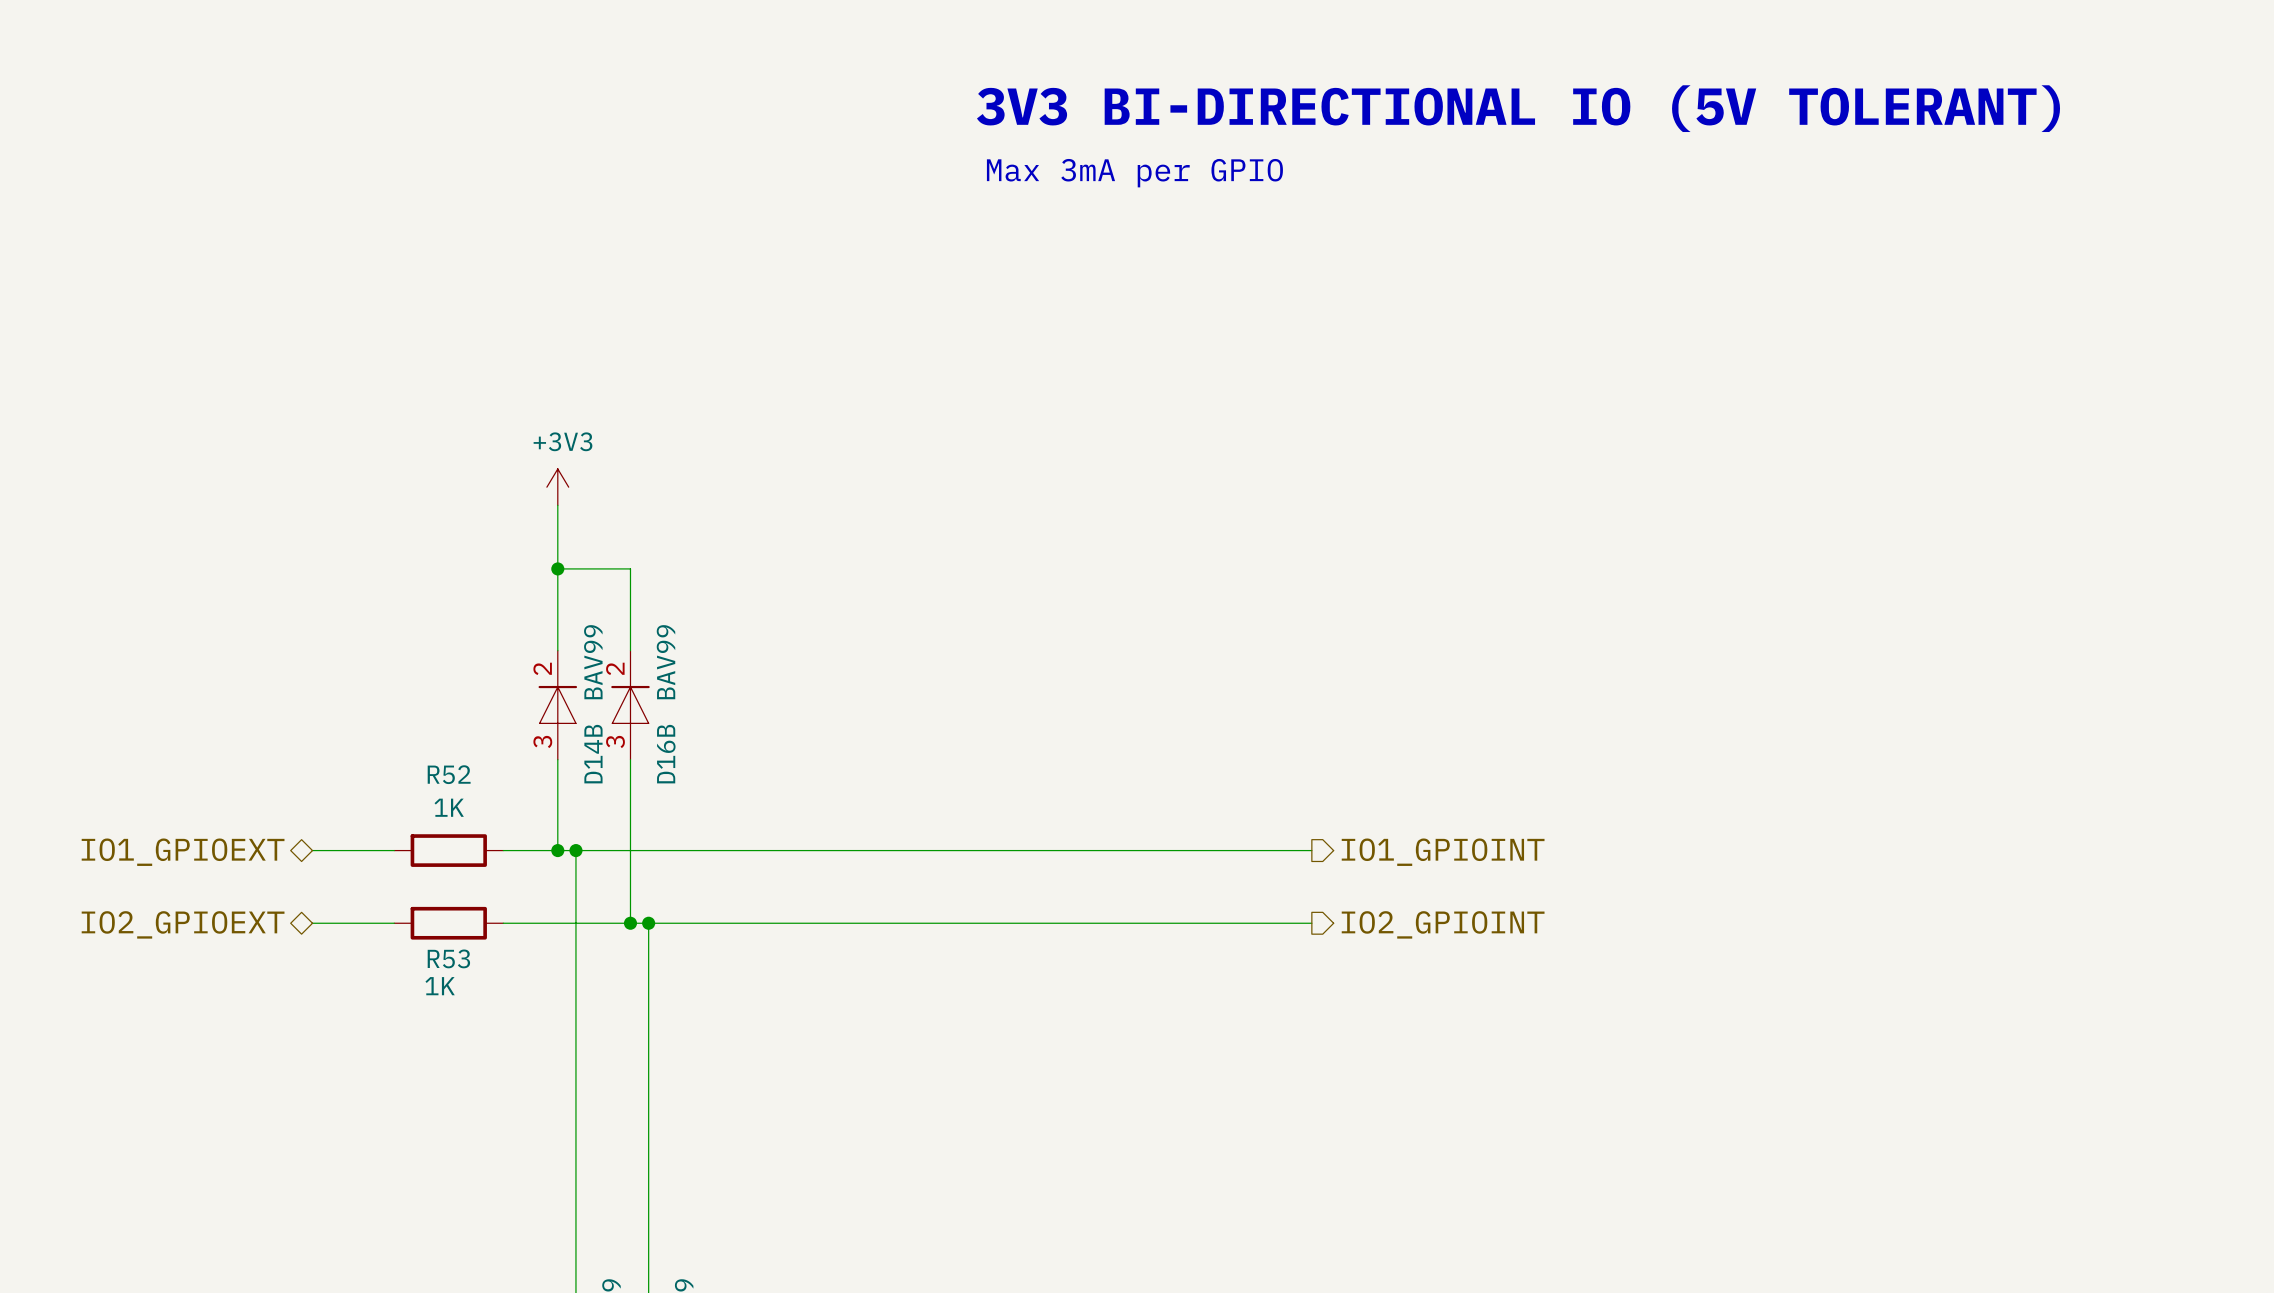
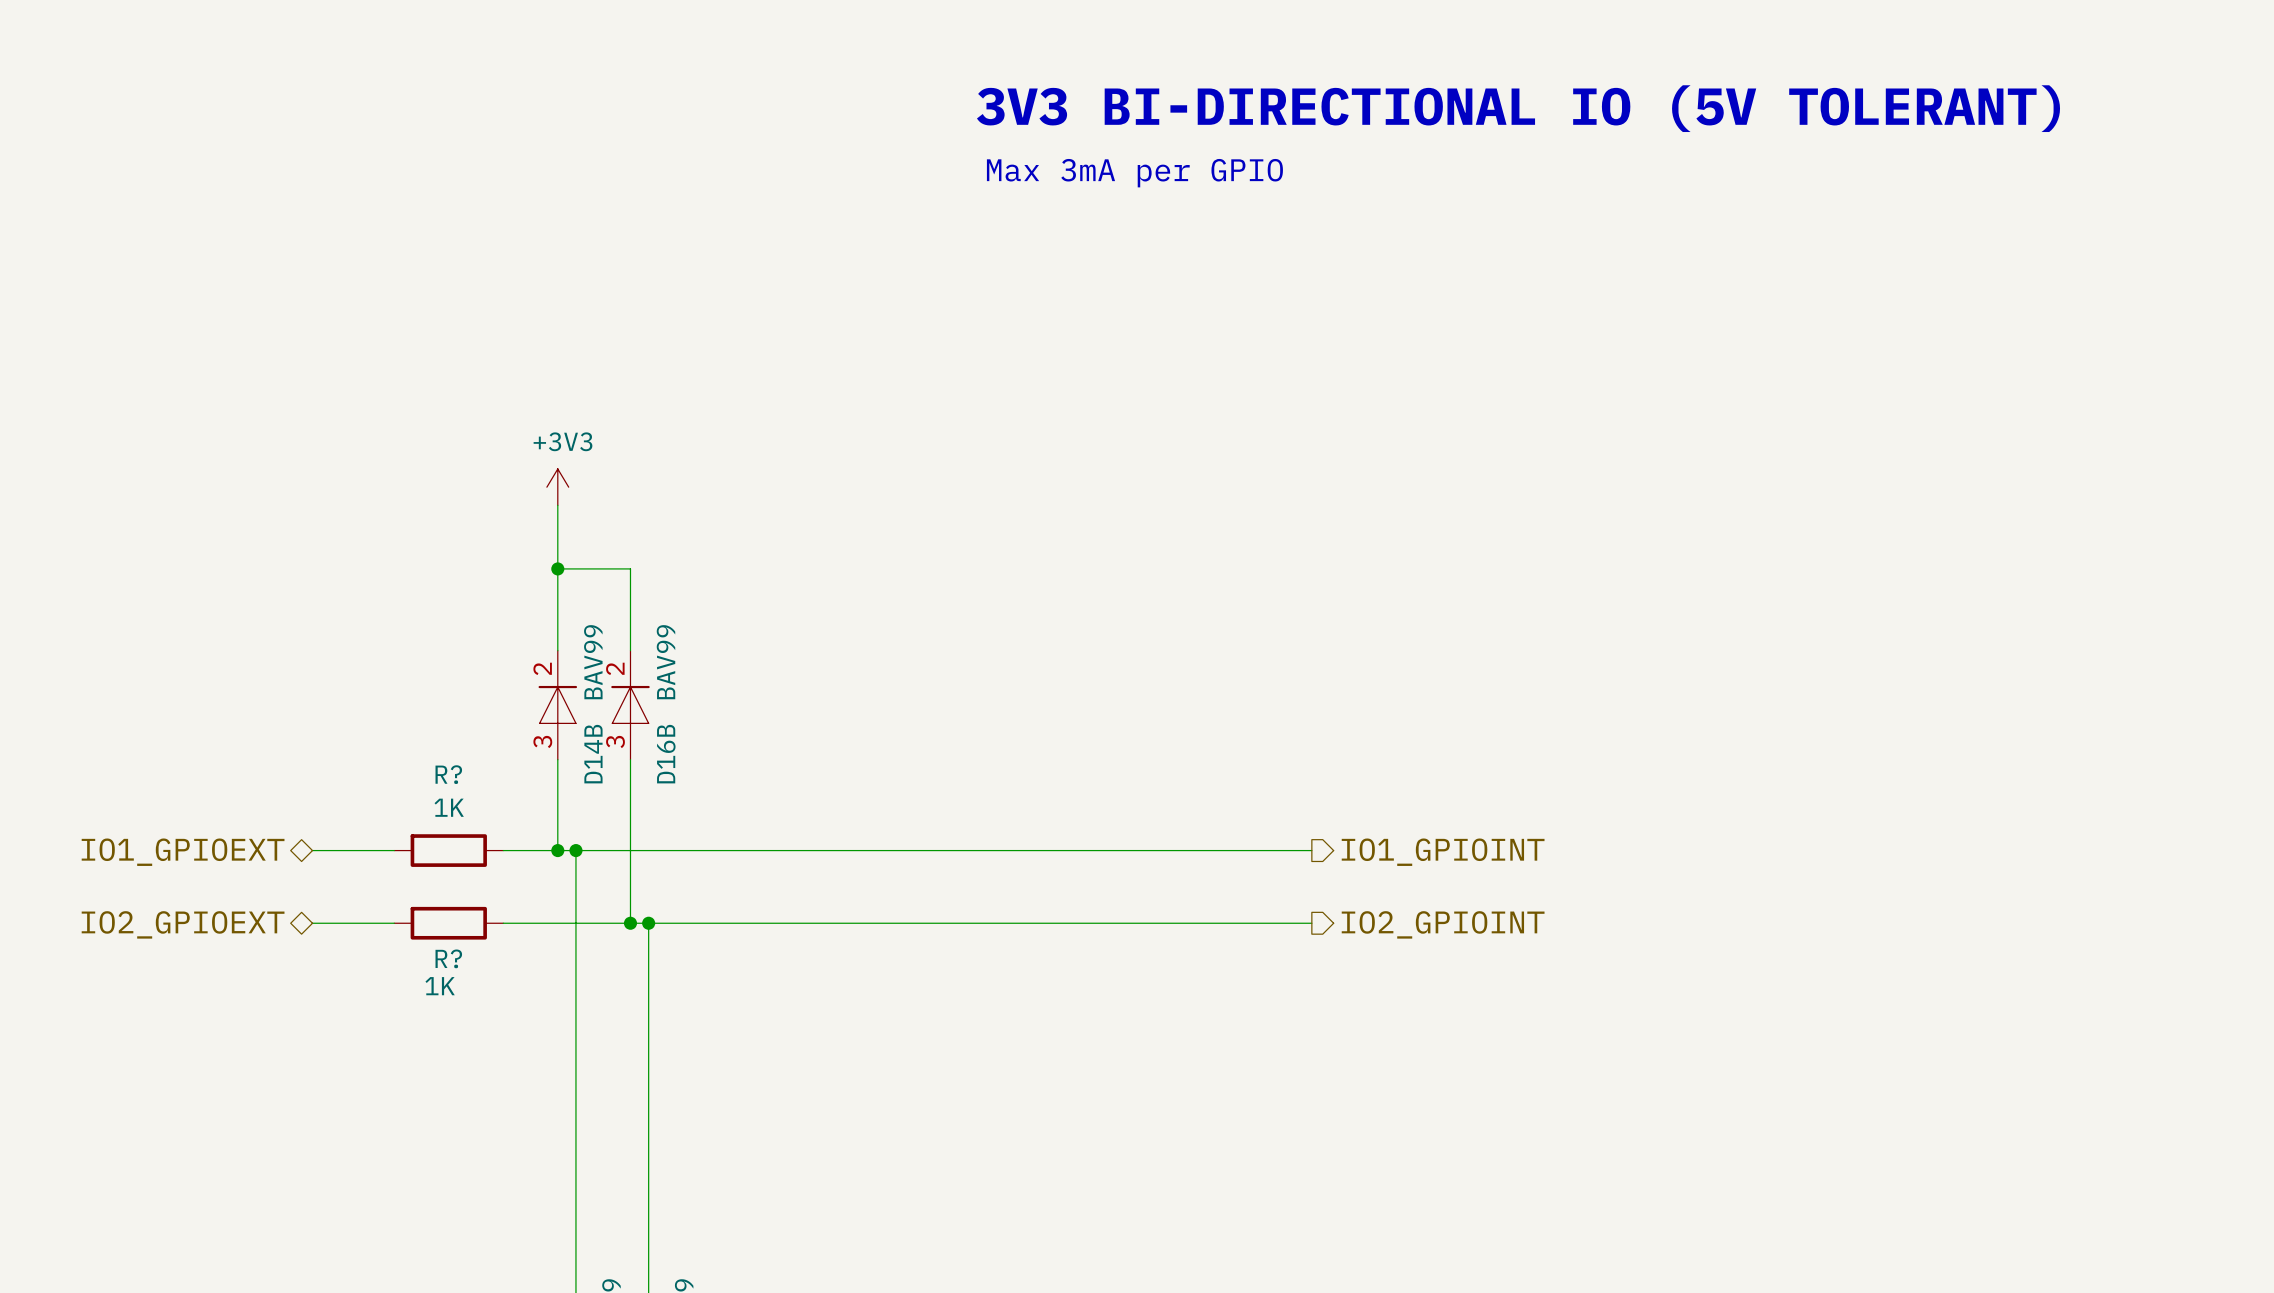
R52 name: R52 (449, 774) -> R? (448, 774)
R53 name: R53 (448, 958) -> R? (448, 958)

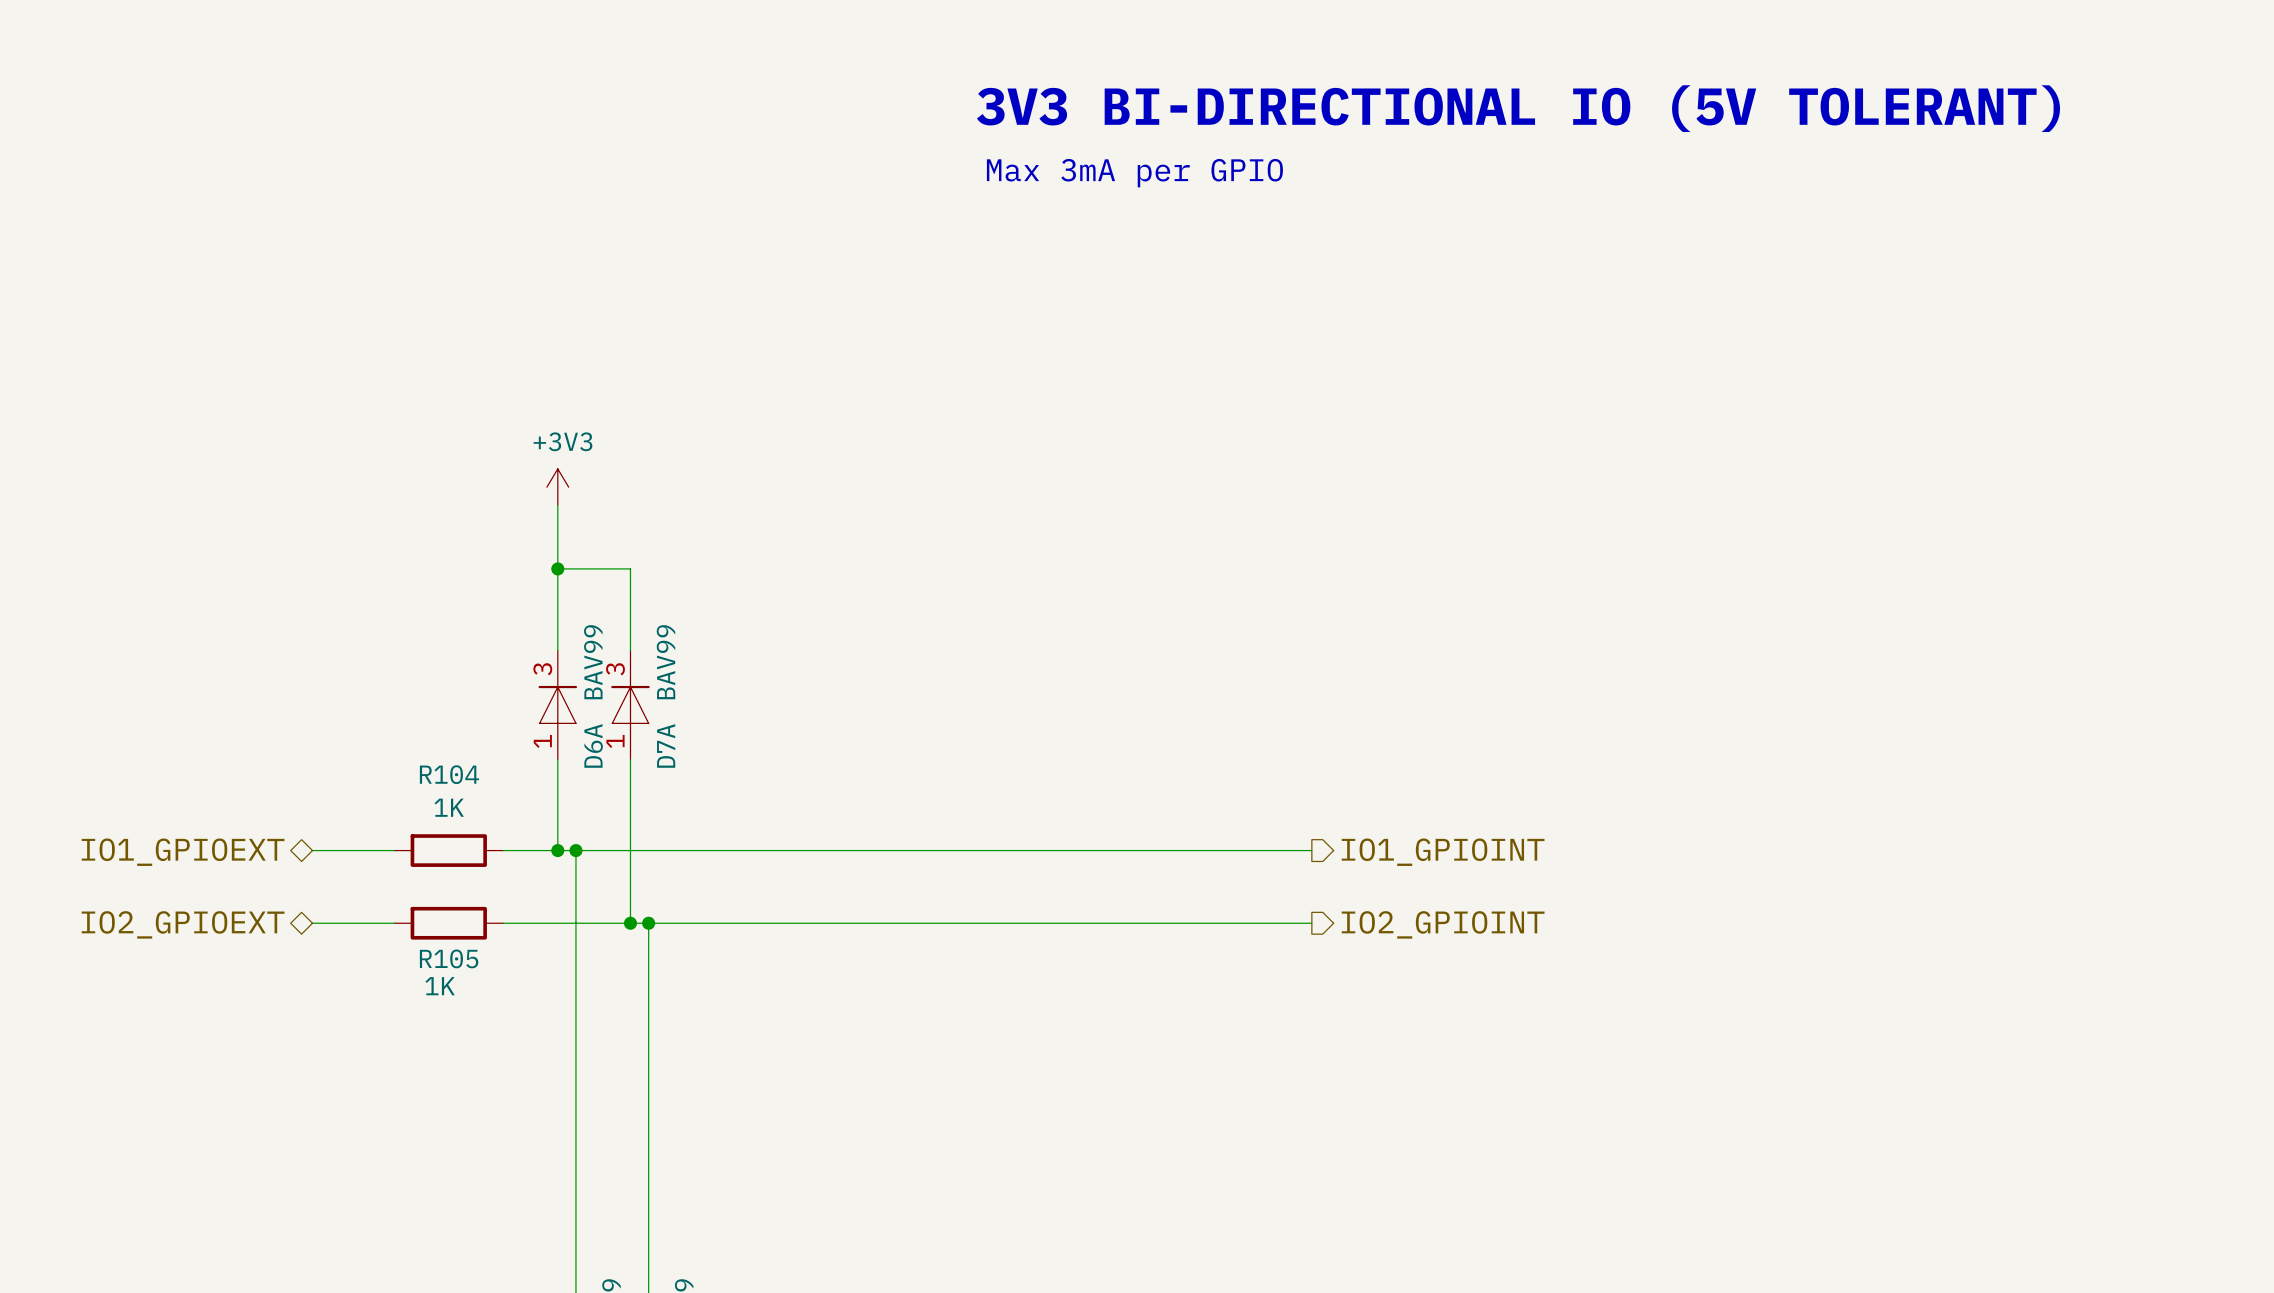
D14B pin number: 2 (542, 668) -> 3 (542, 669)
D16B pin number: 2 (615, 668) -> 3 (615, 669)
D14B pin number: 3 (542, 741) -> 1 (542, 741)
D16B pin number: 3 (615, 741) -> 1 (615, 741)
D14B name: D14B (593, 754) -> D6A (593, 745)
D16B name: D16B (666, 754) -> D7A (666, 745)
R? name: R? (448, 774) -> R104 (449, 774)
R? name: R? (448, 958) -> R105 (449, 958)

